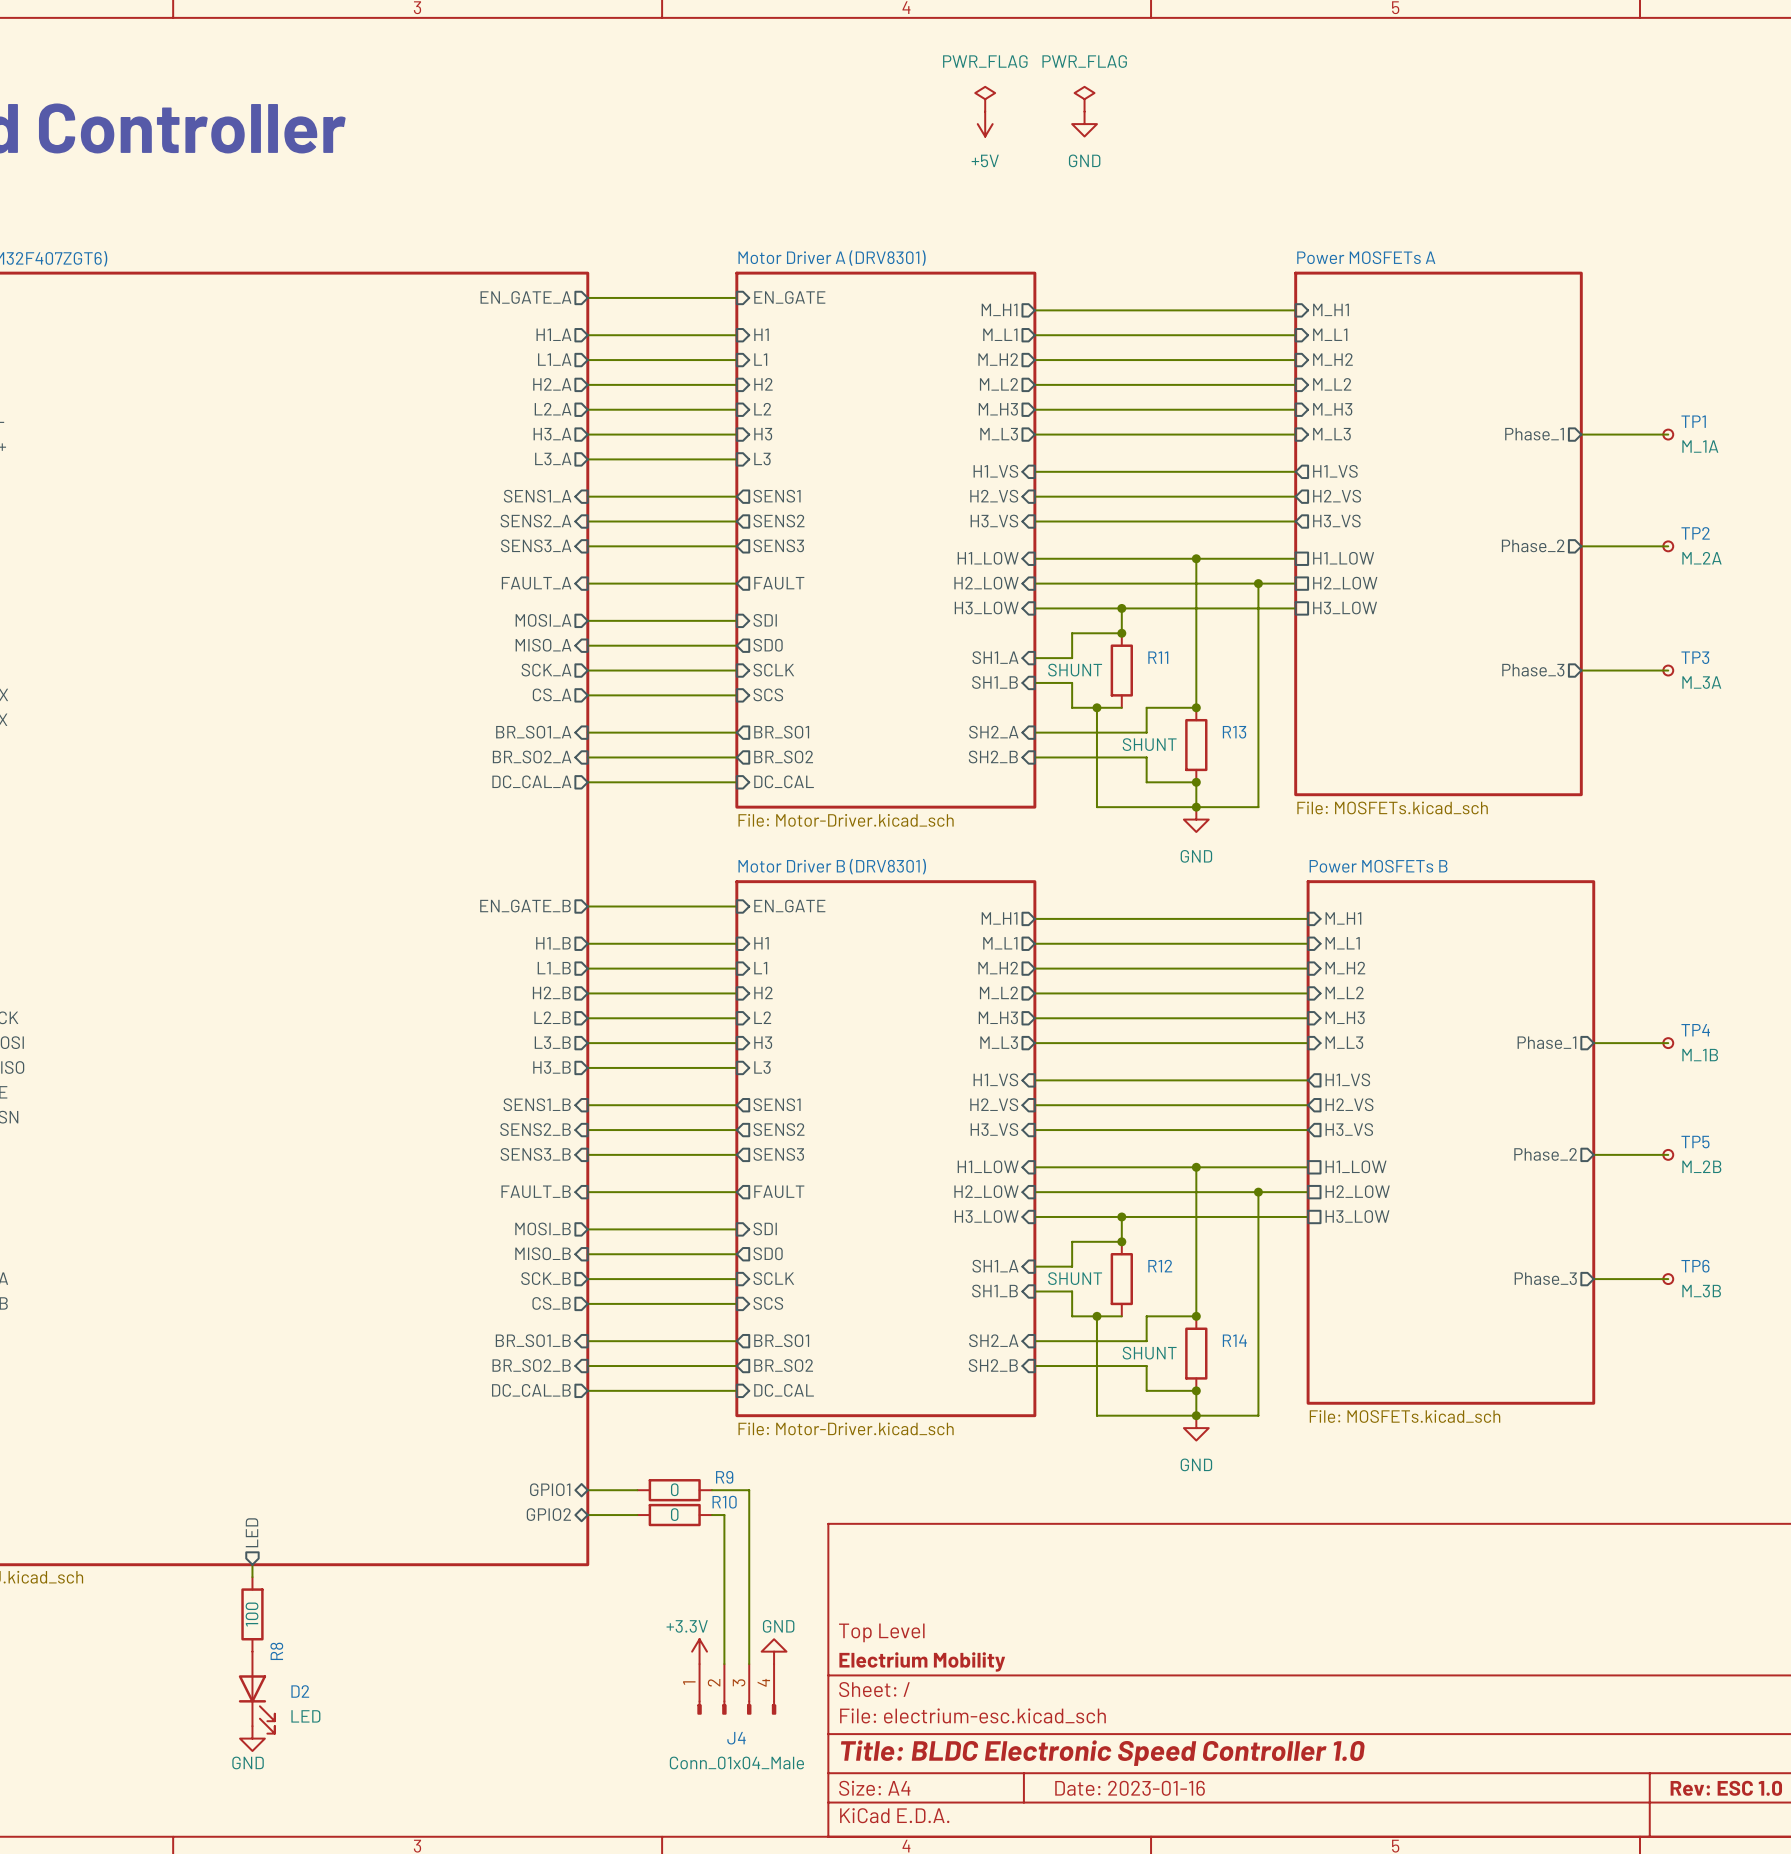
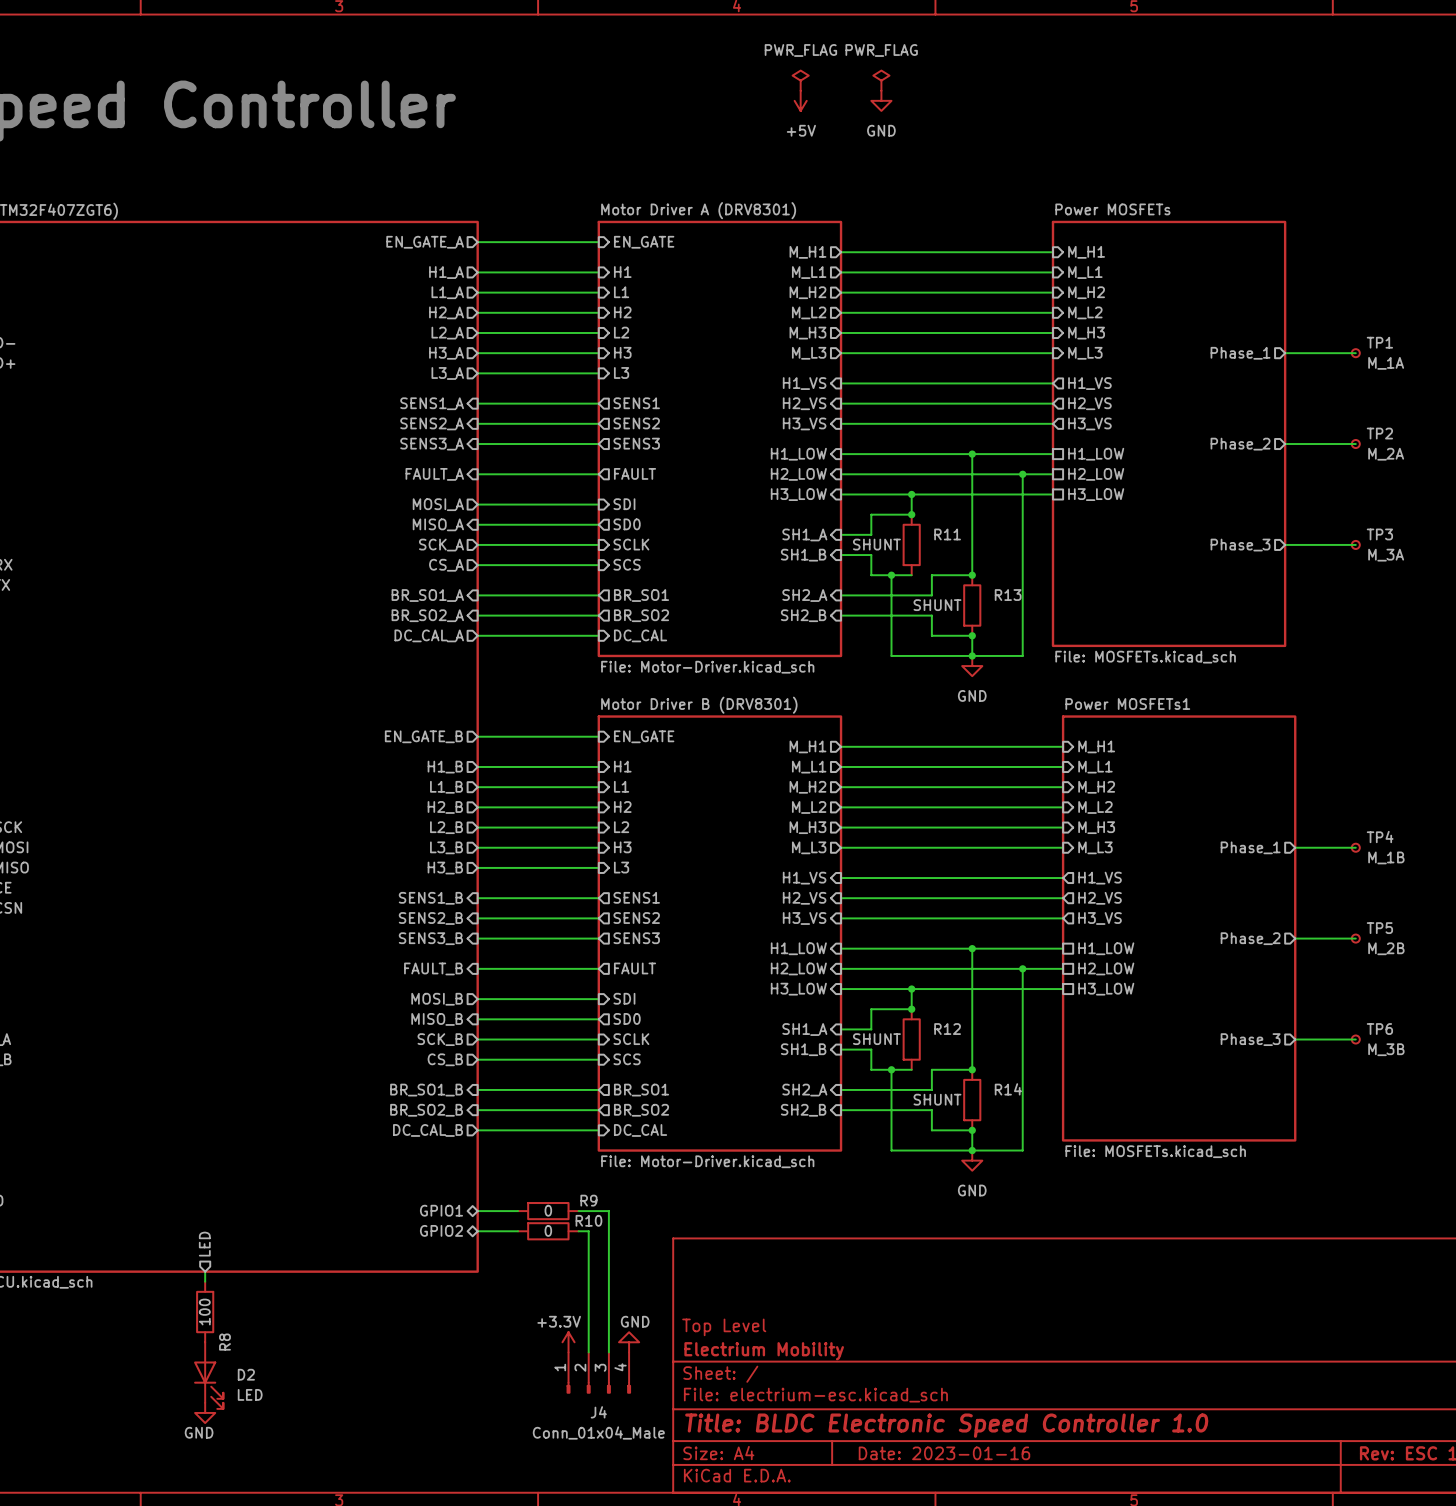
sheet Power MOSFETs A name: Power MOSFETs A (1366, 257) -> Power MOSFETs (1112, 209)
sheet Power MOSFETs B name: Power MOSFETs B (1378, 866) -> Power MOSFETs1 (1127, 704)

